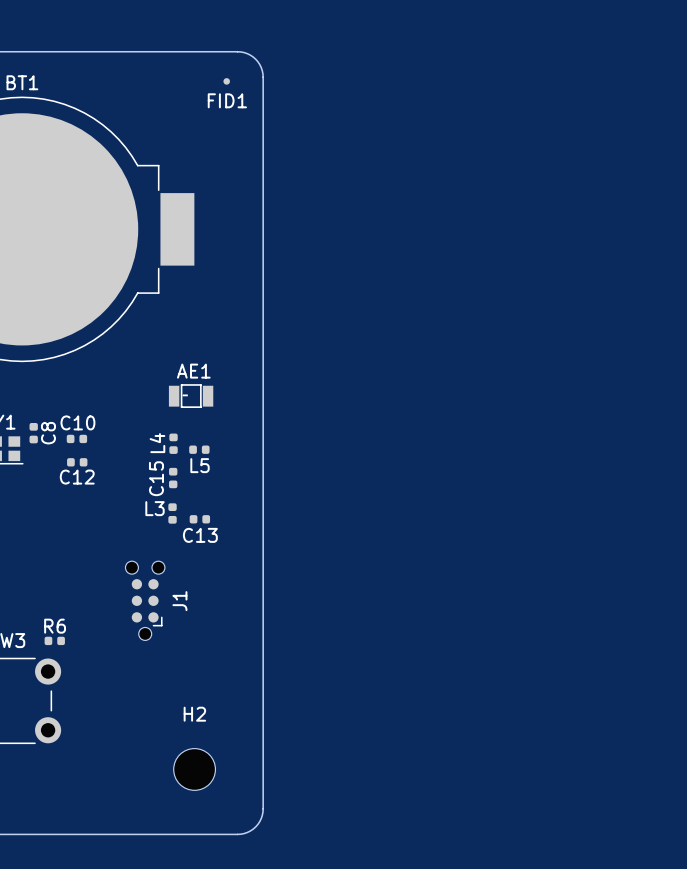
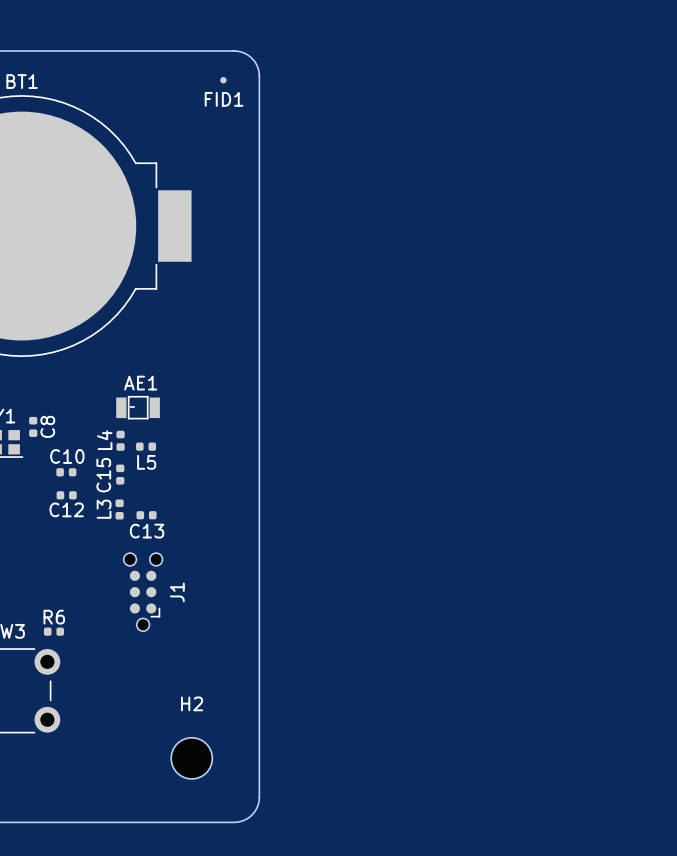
AE1 position: (191, 396) -> (138, 407)
C10 position: (76, 438) -> (66, 472)
L4 position: (173, 443) -> (120, 440)
L5 position: (199, 449) -> (146, 446)
C12 position: (77, 462) -> (66, 495)
C15 position: (173, 478) -> (120, 474)
L3 name rotation: 0° (155, 508) -> 90° counterclockwise (104, 509)
L3 position: (172, 513) -> (119, 509)
C13 position: (199, 519) -> (146, 515)

